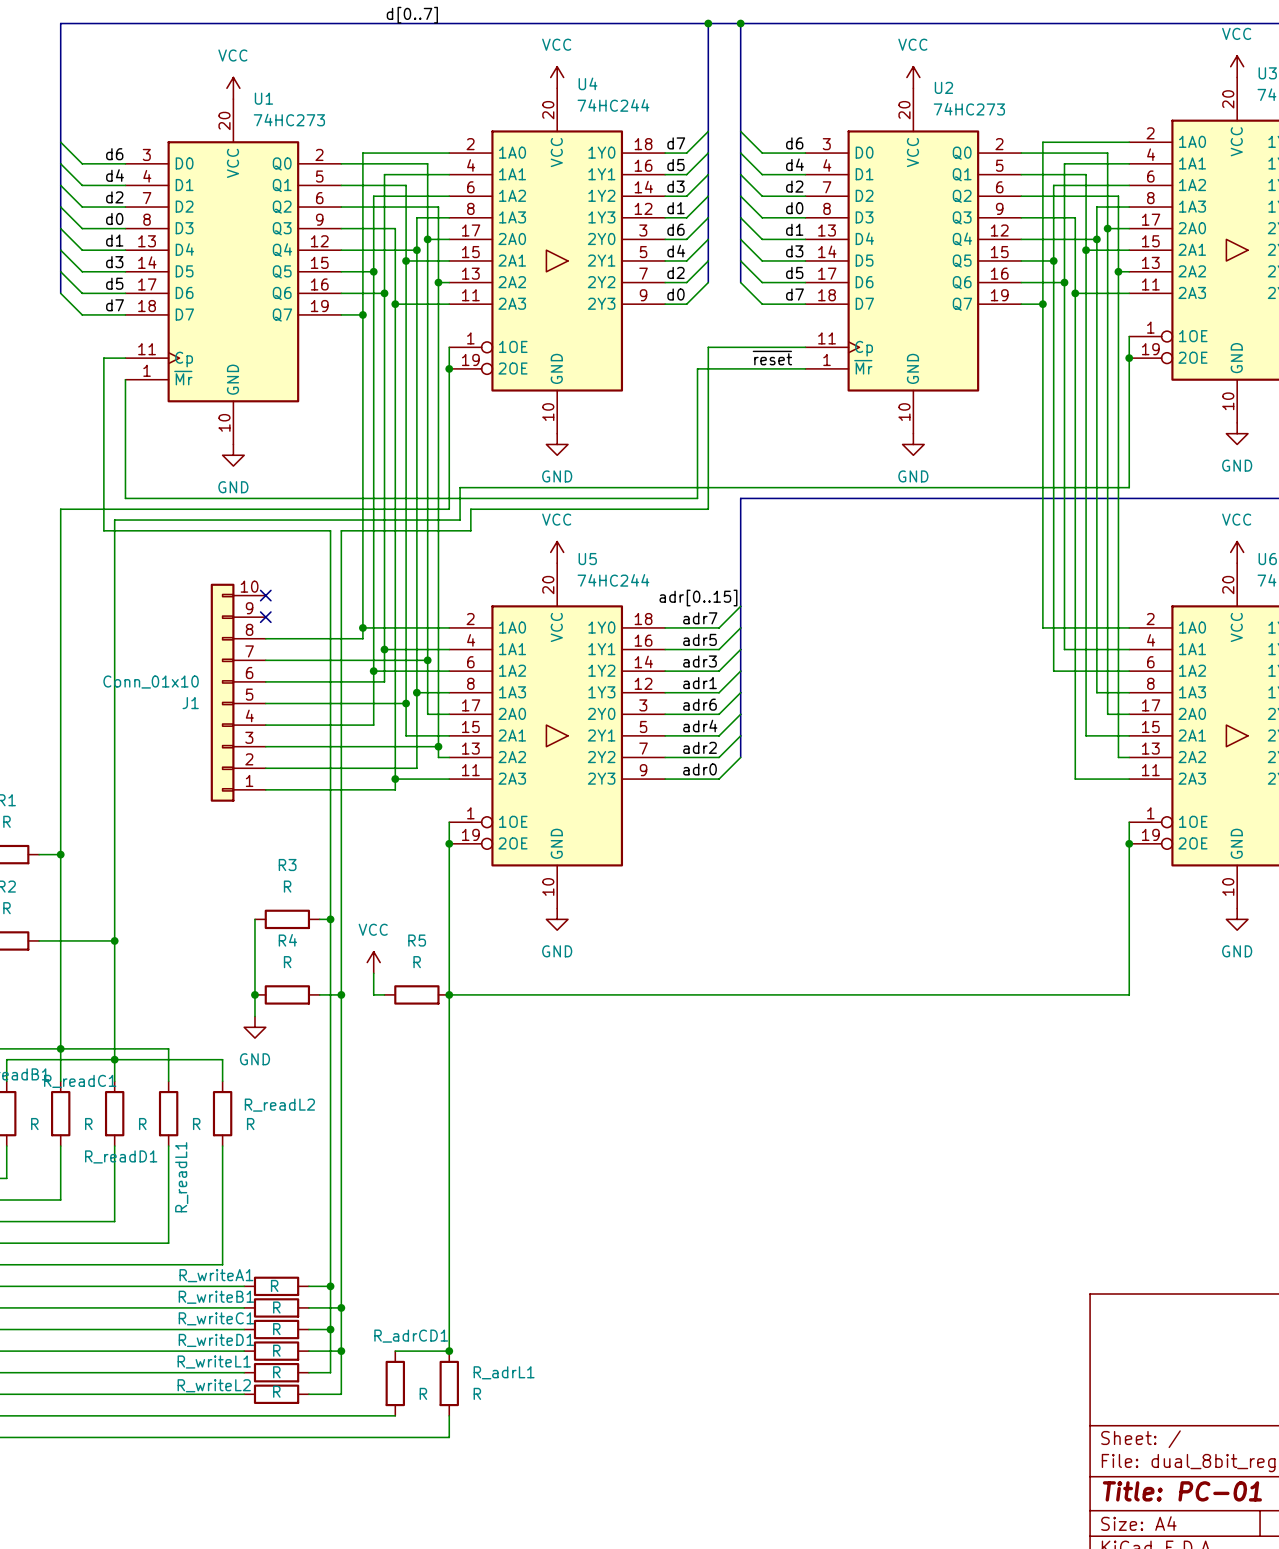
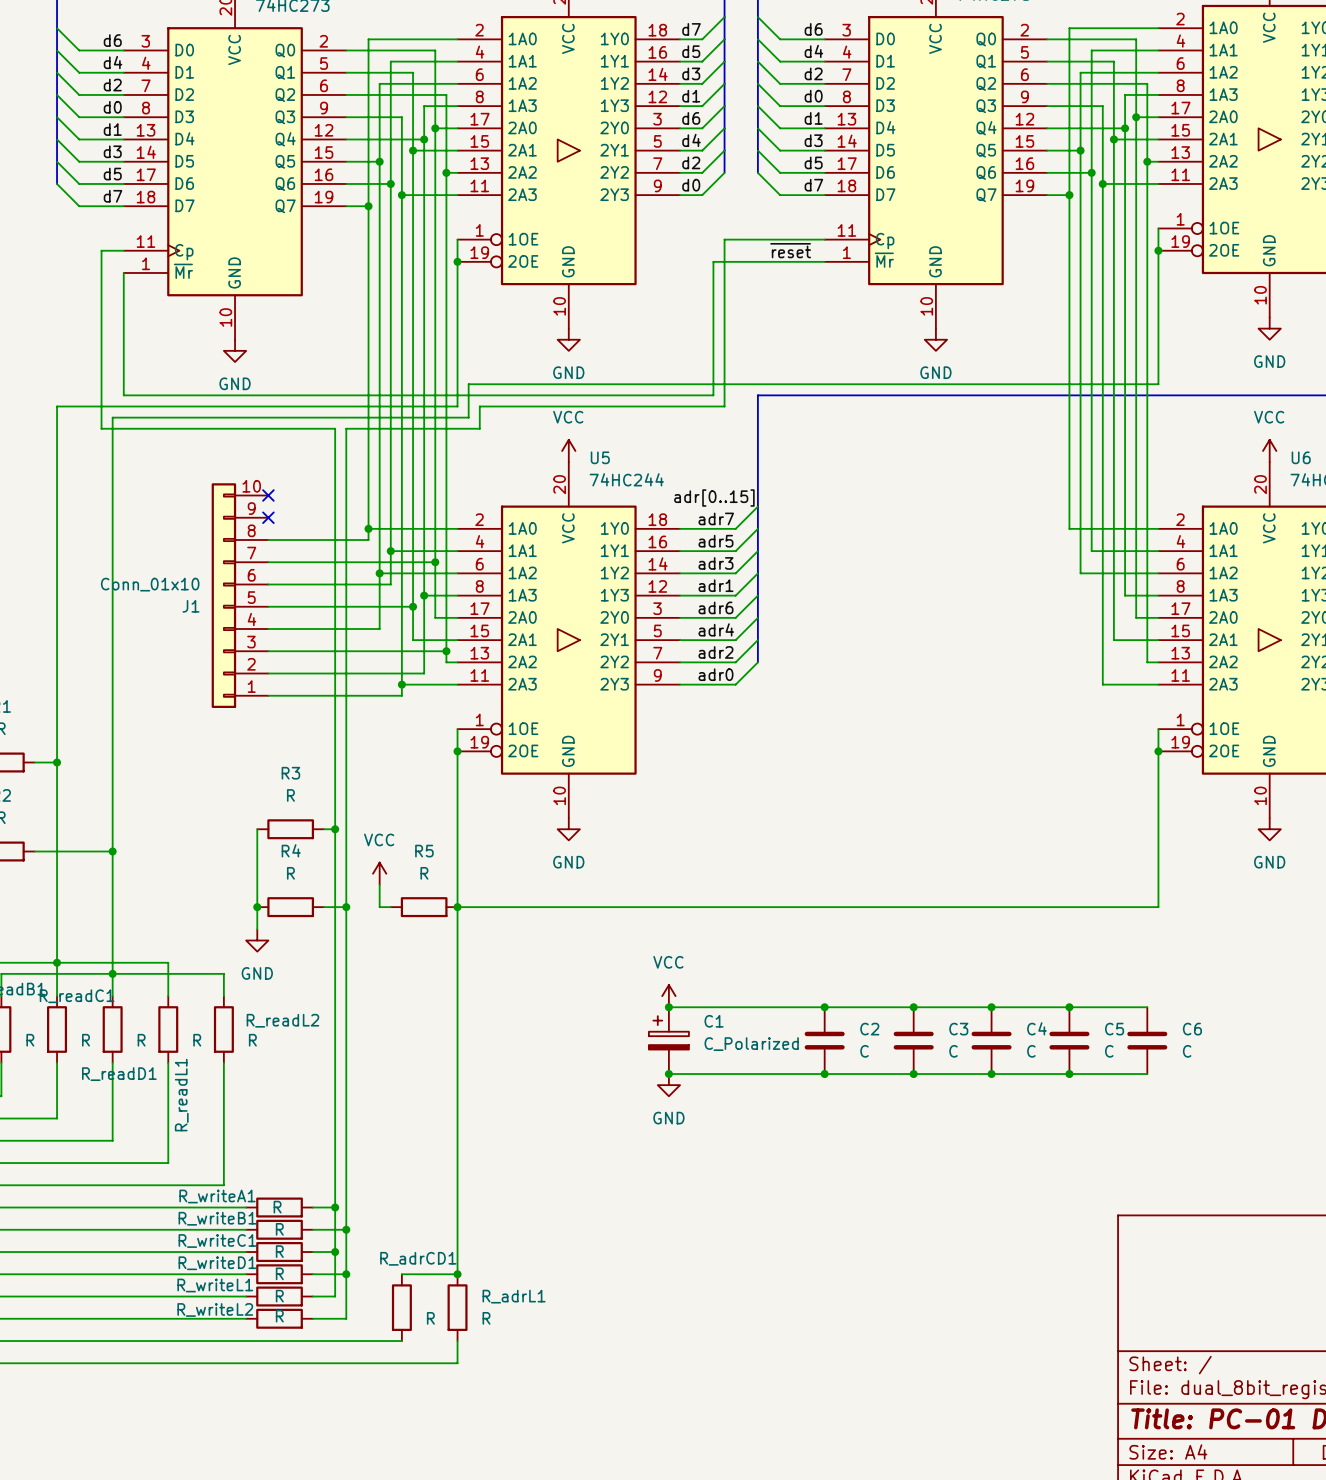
power symbol: none -> VCC (668, 996)
wire: none -> (668, 1007) (1147, 1007)
junction: none -> (668, 1007)
junction: none -> (824, 1007)
junction: none -> (913, 1007)
junction: none -> (991, 1007)
junction: none -> (1069, 1007)
C1: none -> C_Polarized (668, 1040)
C2: none -> C (824, 1040)
C3: none -> C (913, 1040)
C4: none -> C (991, 1040)
C5: none -> C (1069, 1040)
C6: none -> C (1147, 1040)
wire: none -> (668, 1074) (1147, 1074)
junction: none -> (668, 1074)
junction: none -> (824, 1074)
junction: none -> (913, 1074)
junction: none -> (991, 1074)
junction: none -> (1069, 1074)
power symbol: none -> GND (668, 1085)

